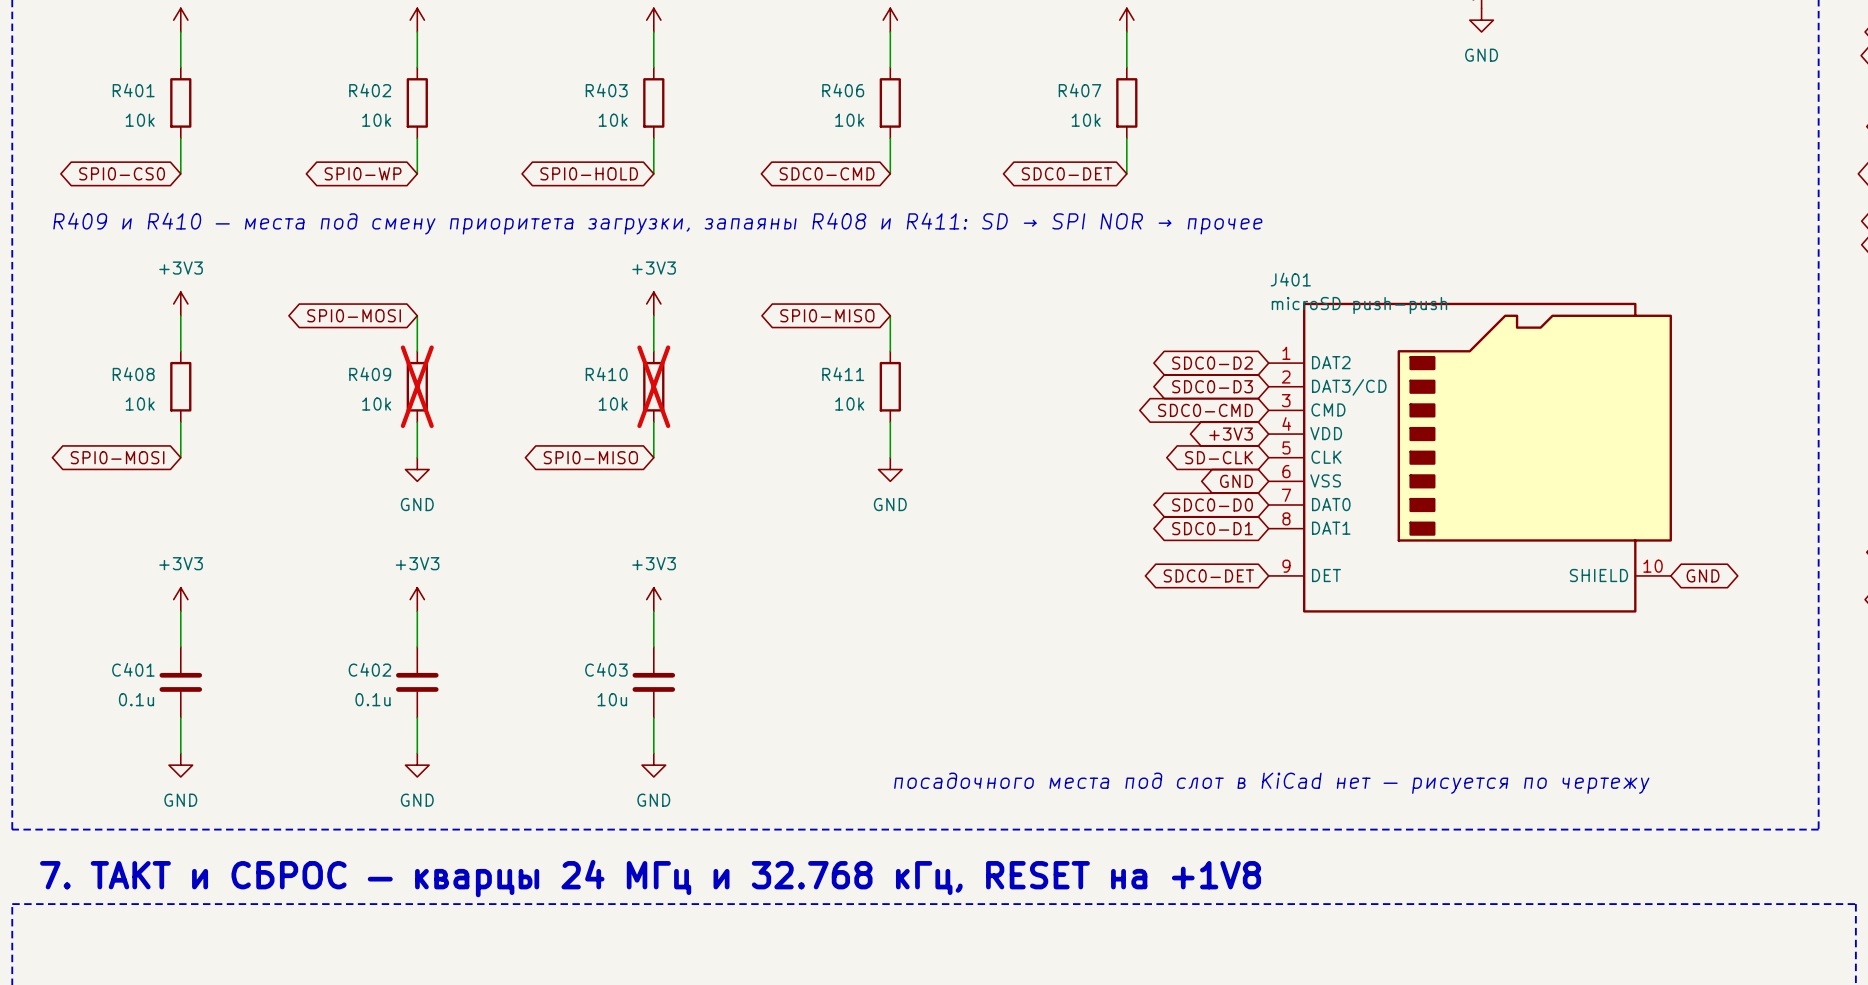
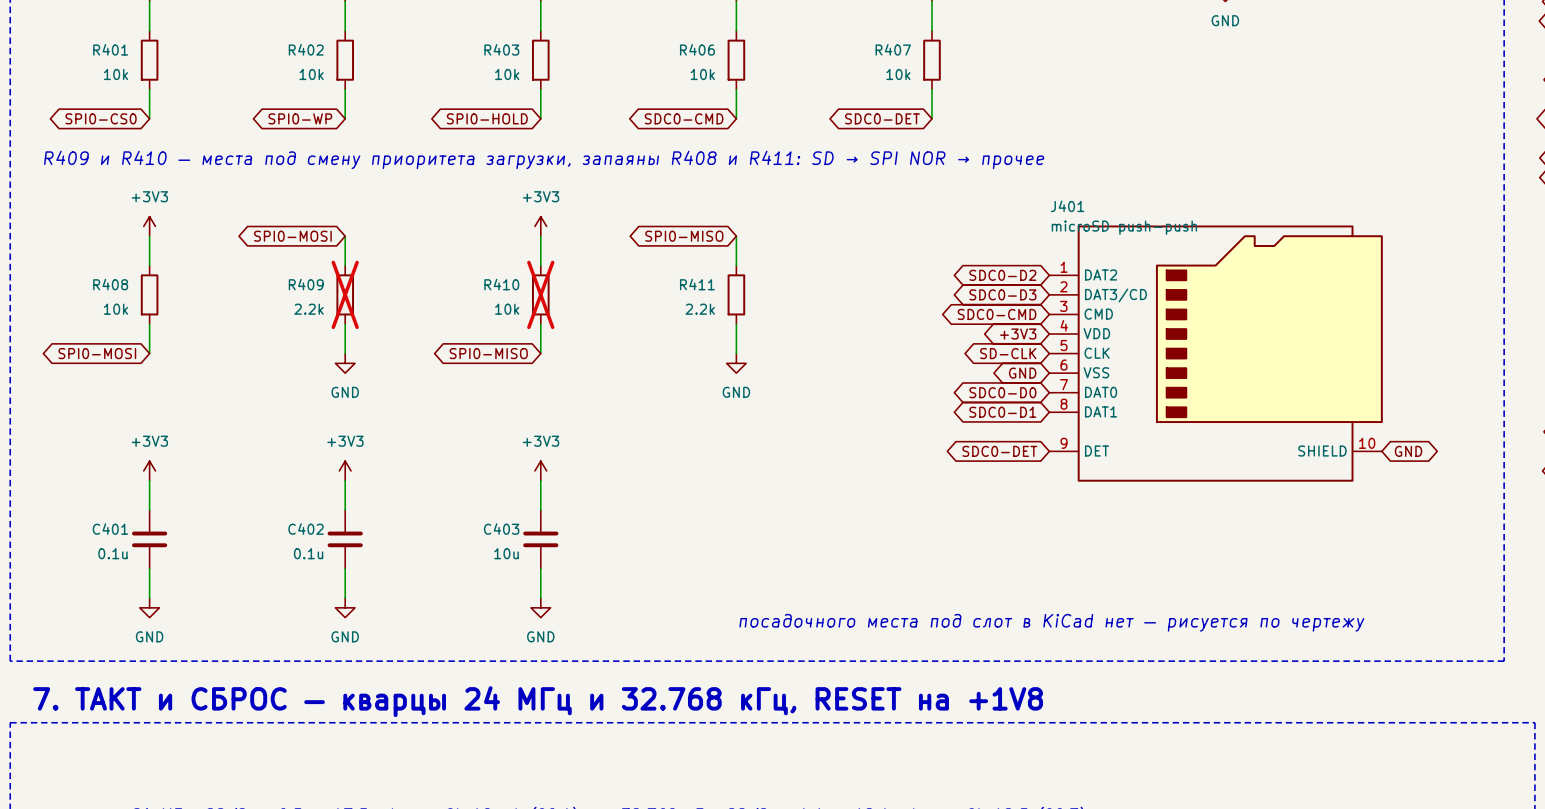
R409 value: 10k (376, 404) -> 2.2k (309, 309)
R411 value: 10k (849, 404) -> 2.2k (700, 309)

